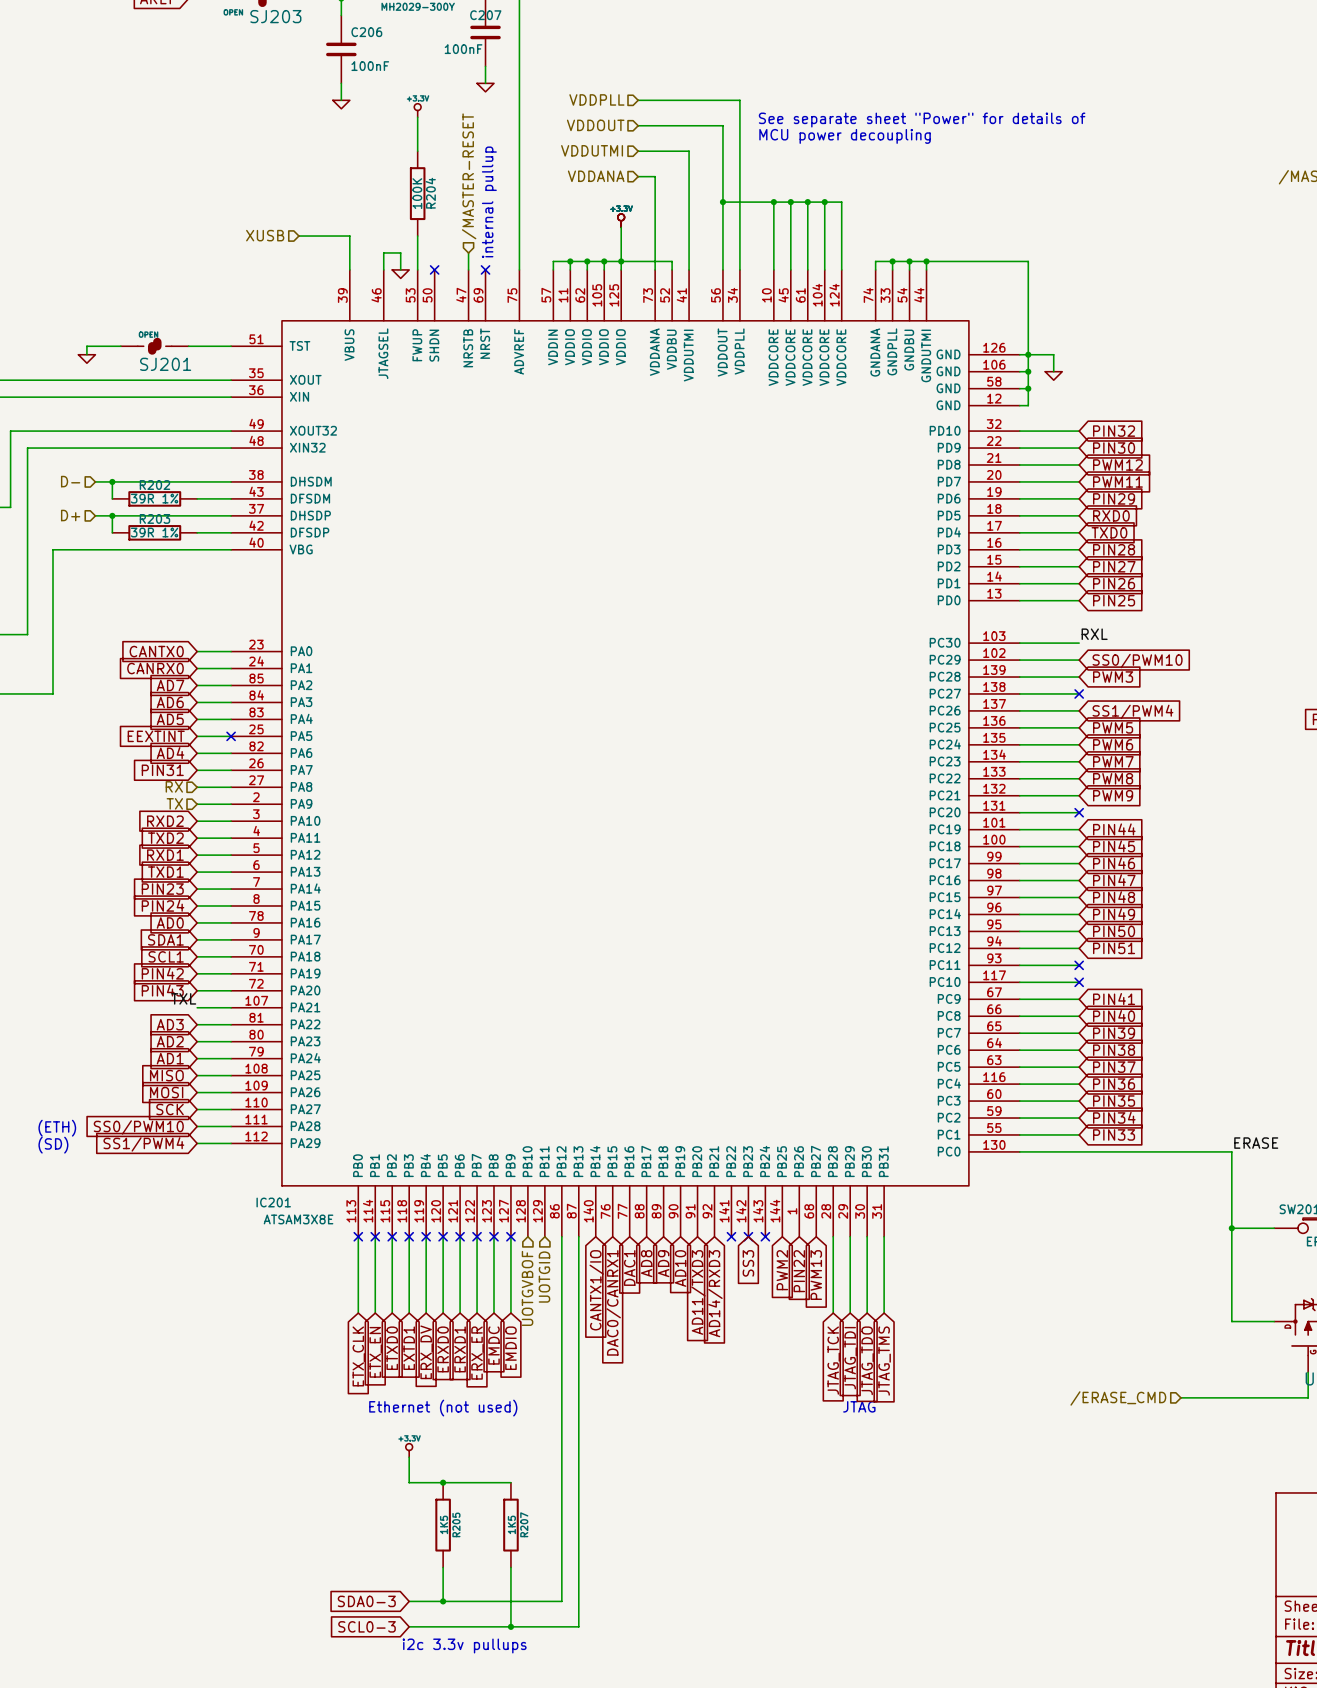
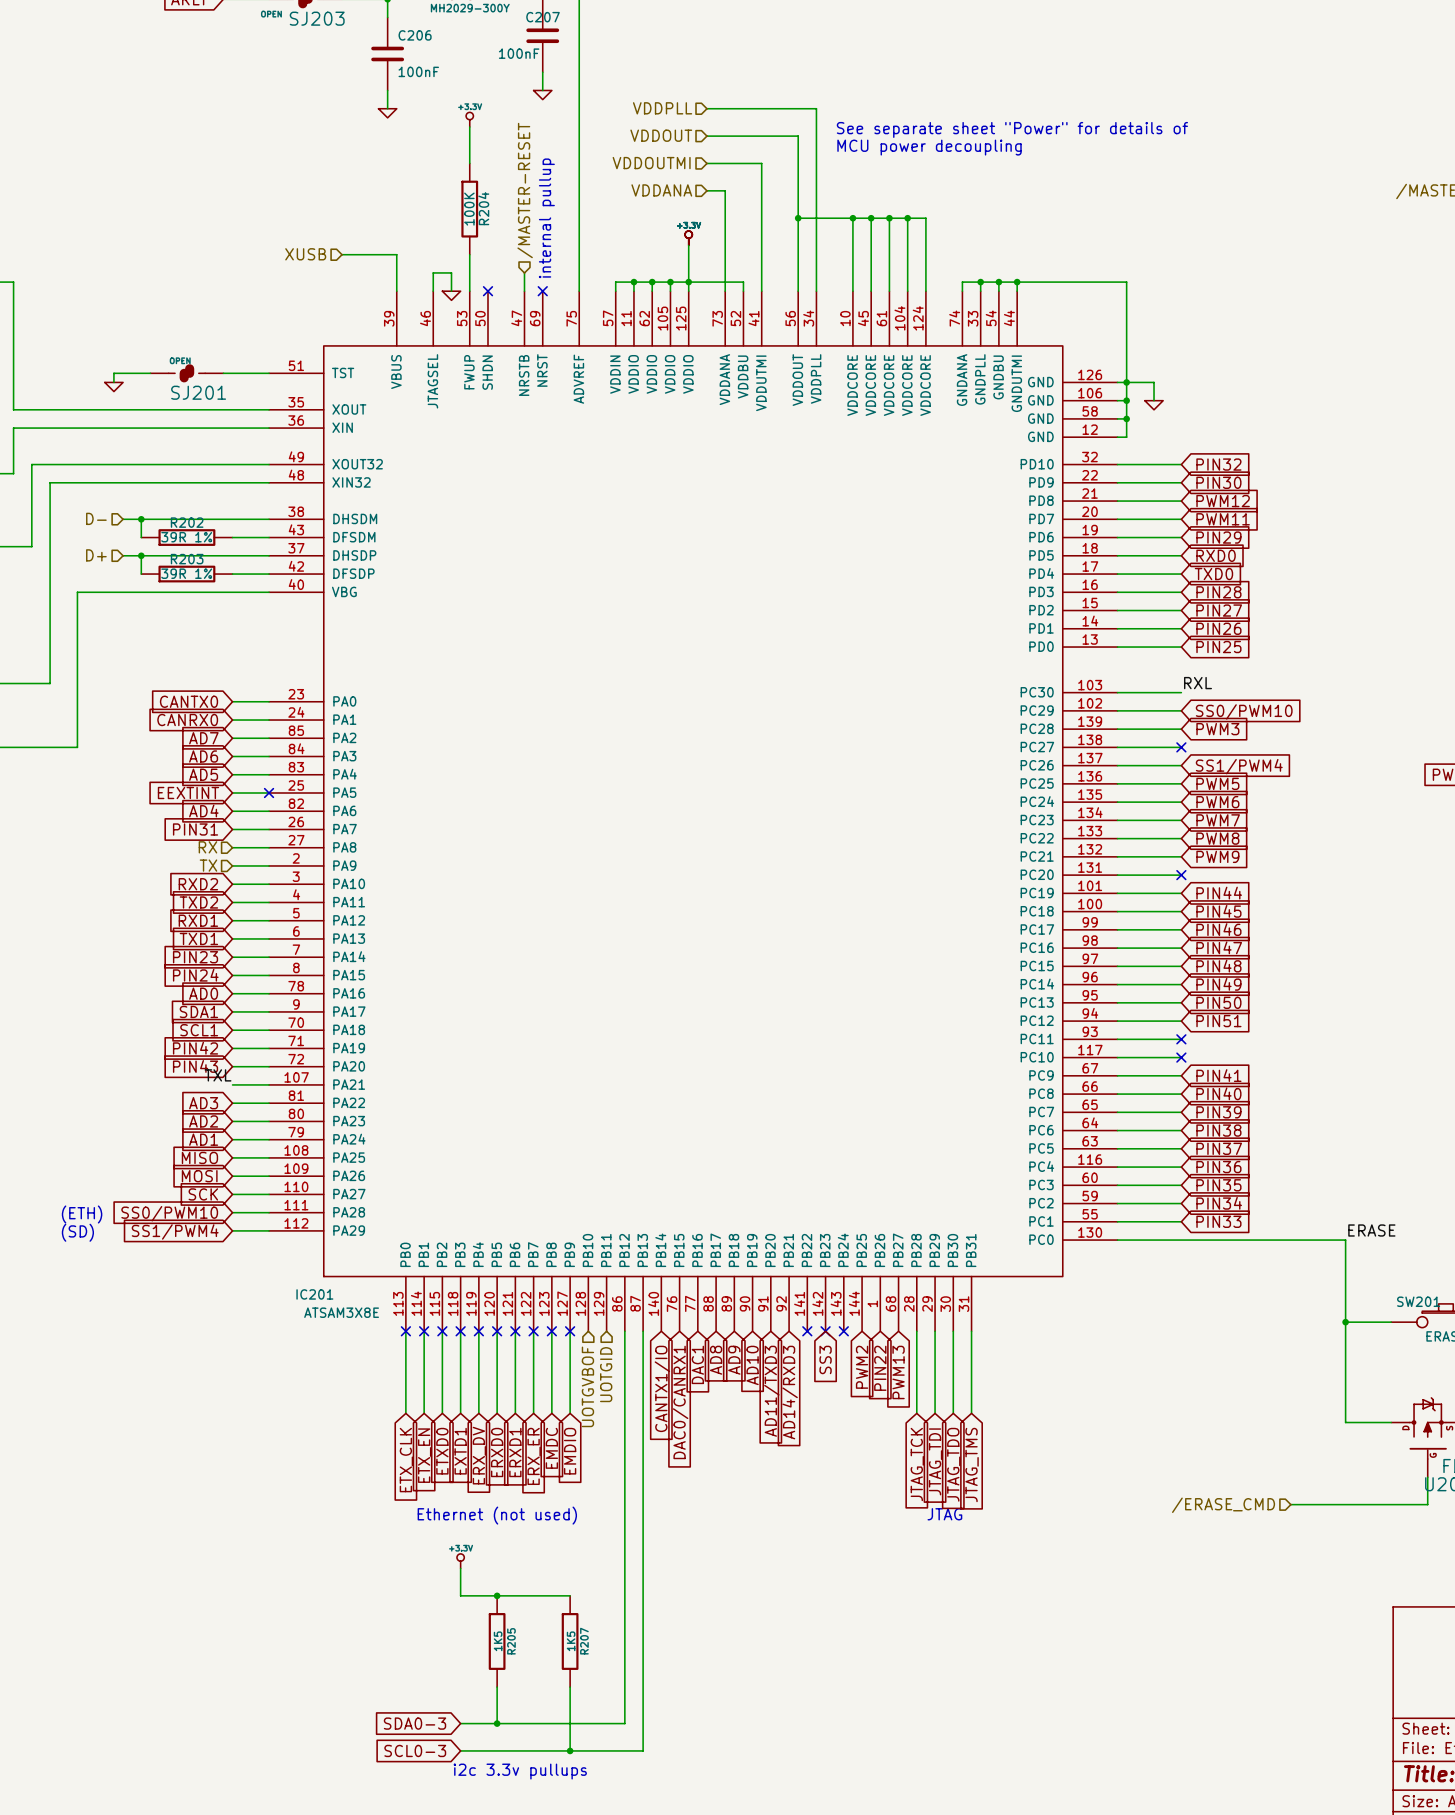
hierarchical label: VDDUTMI (592, 150) -> VDDOUTMI (651, 163)

